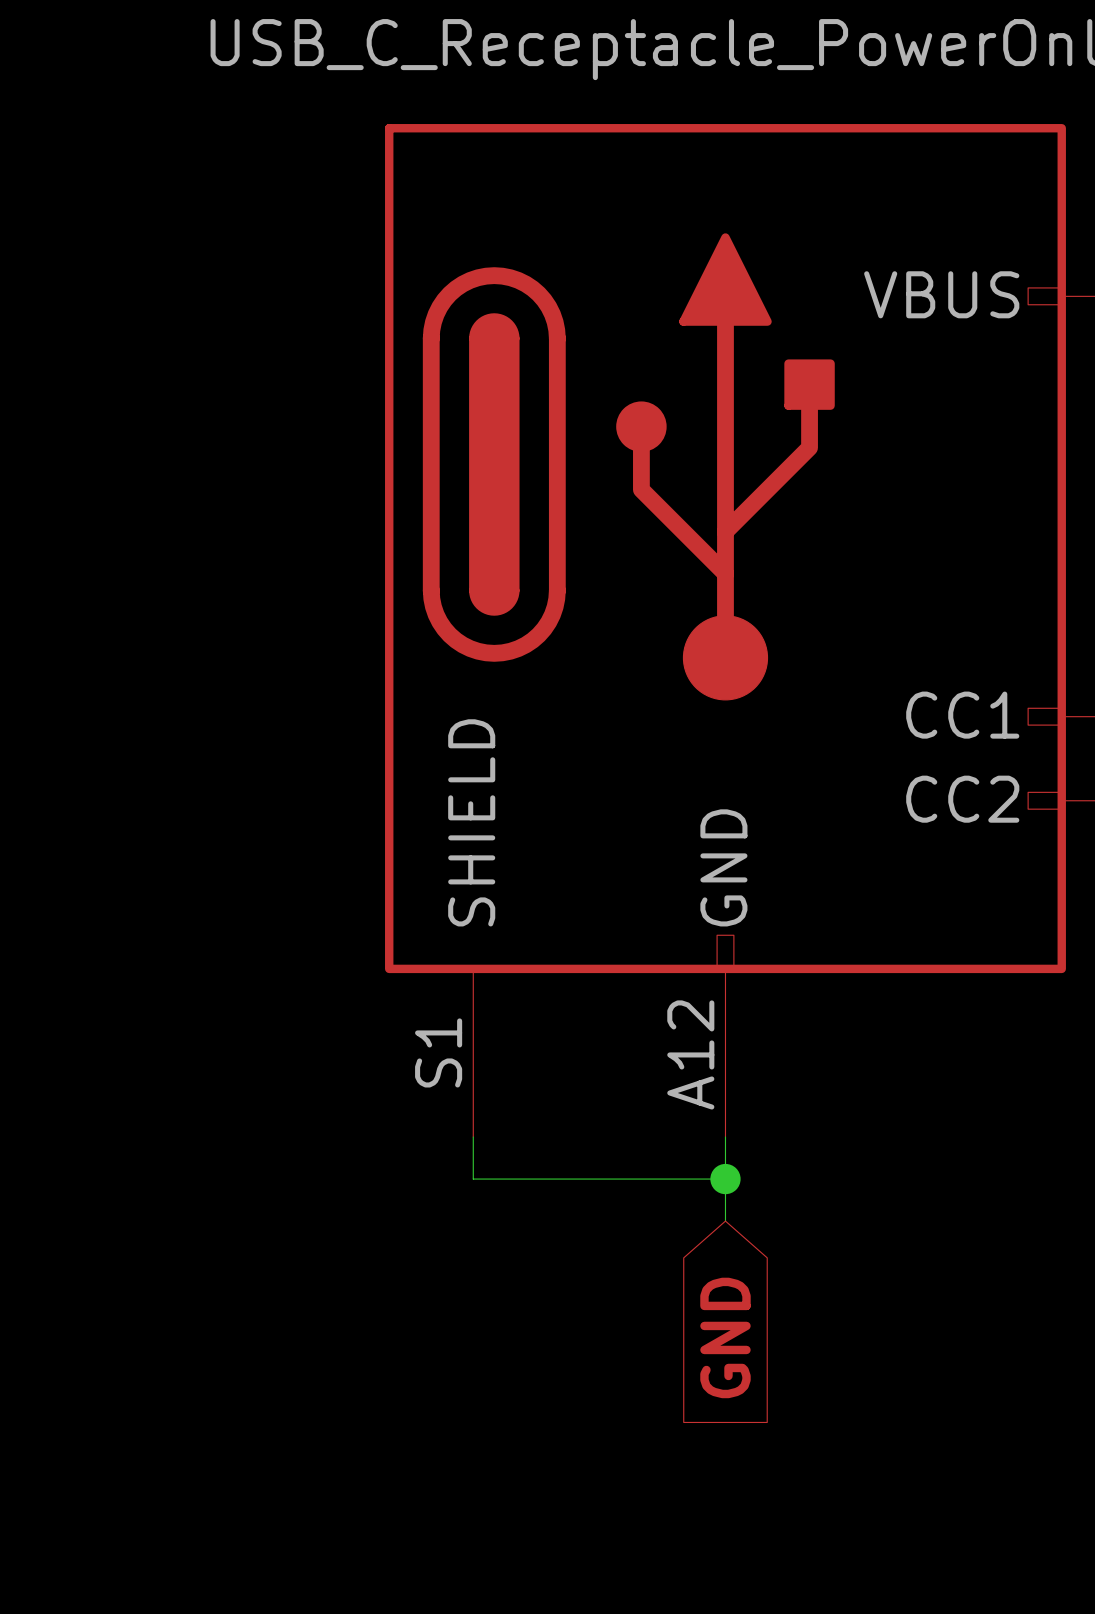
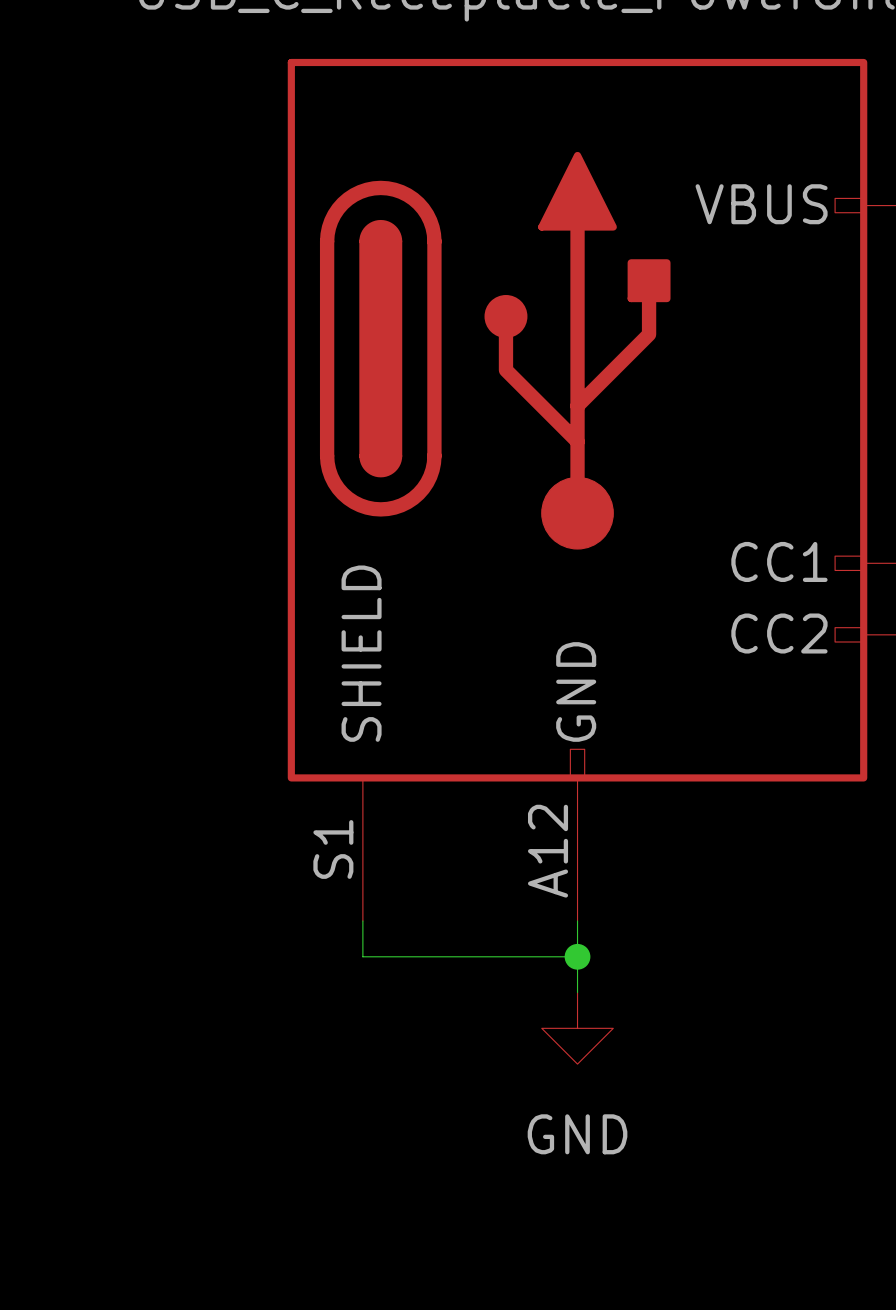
power symbol: none -> GND (577, 1028)
global label: GND (725, 1337) -> none

